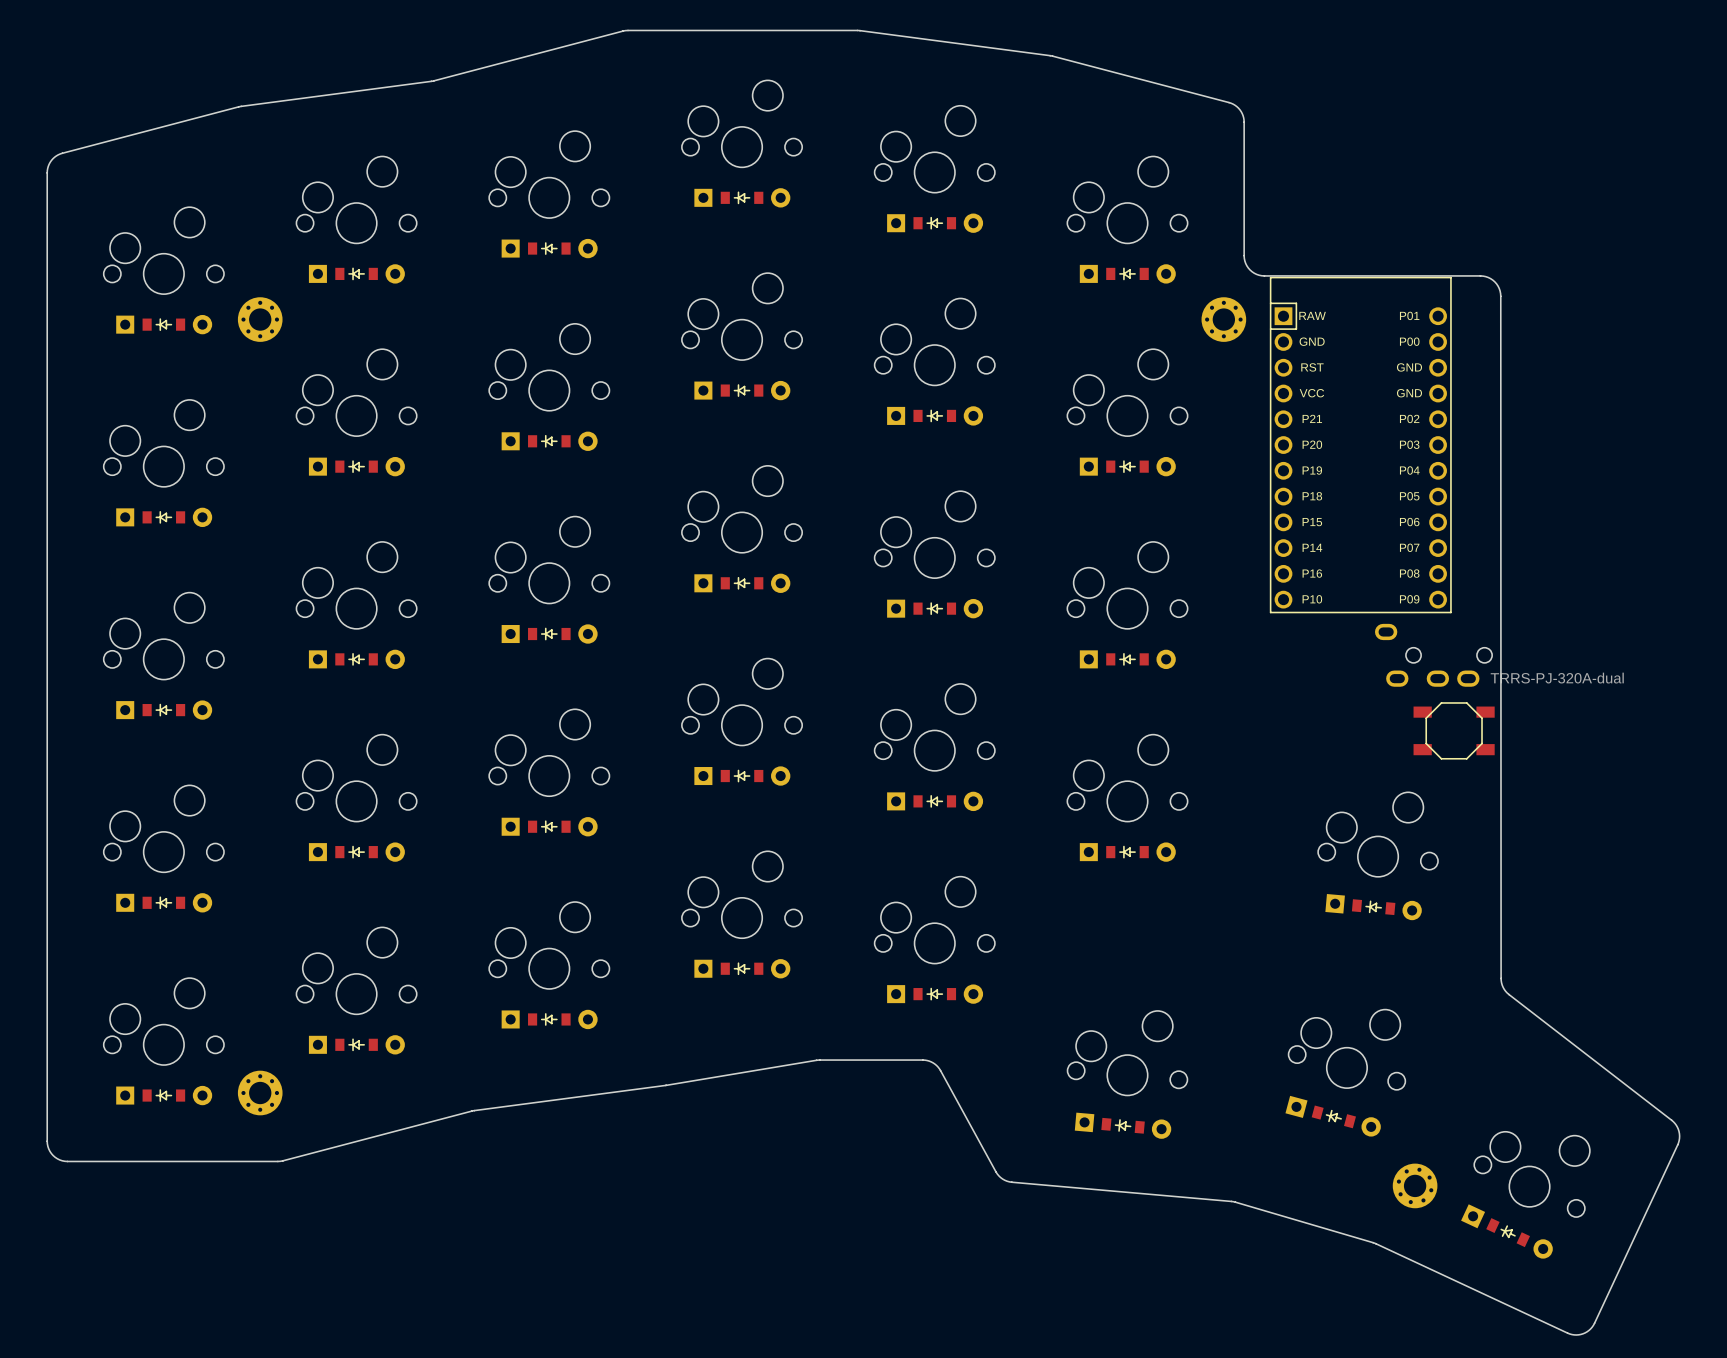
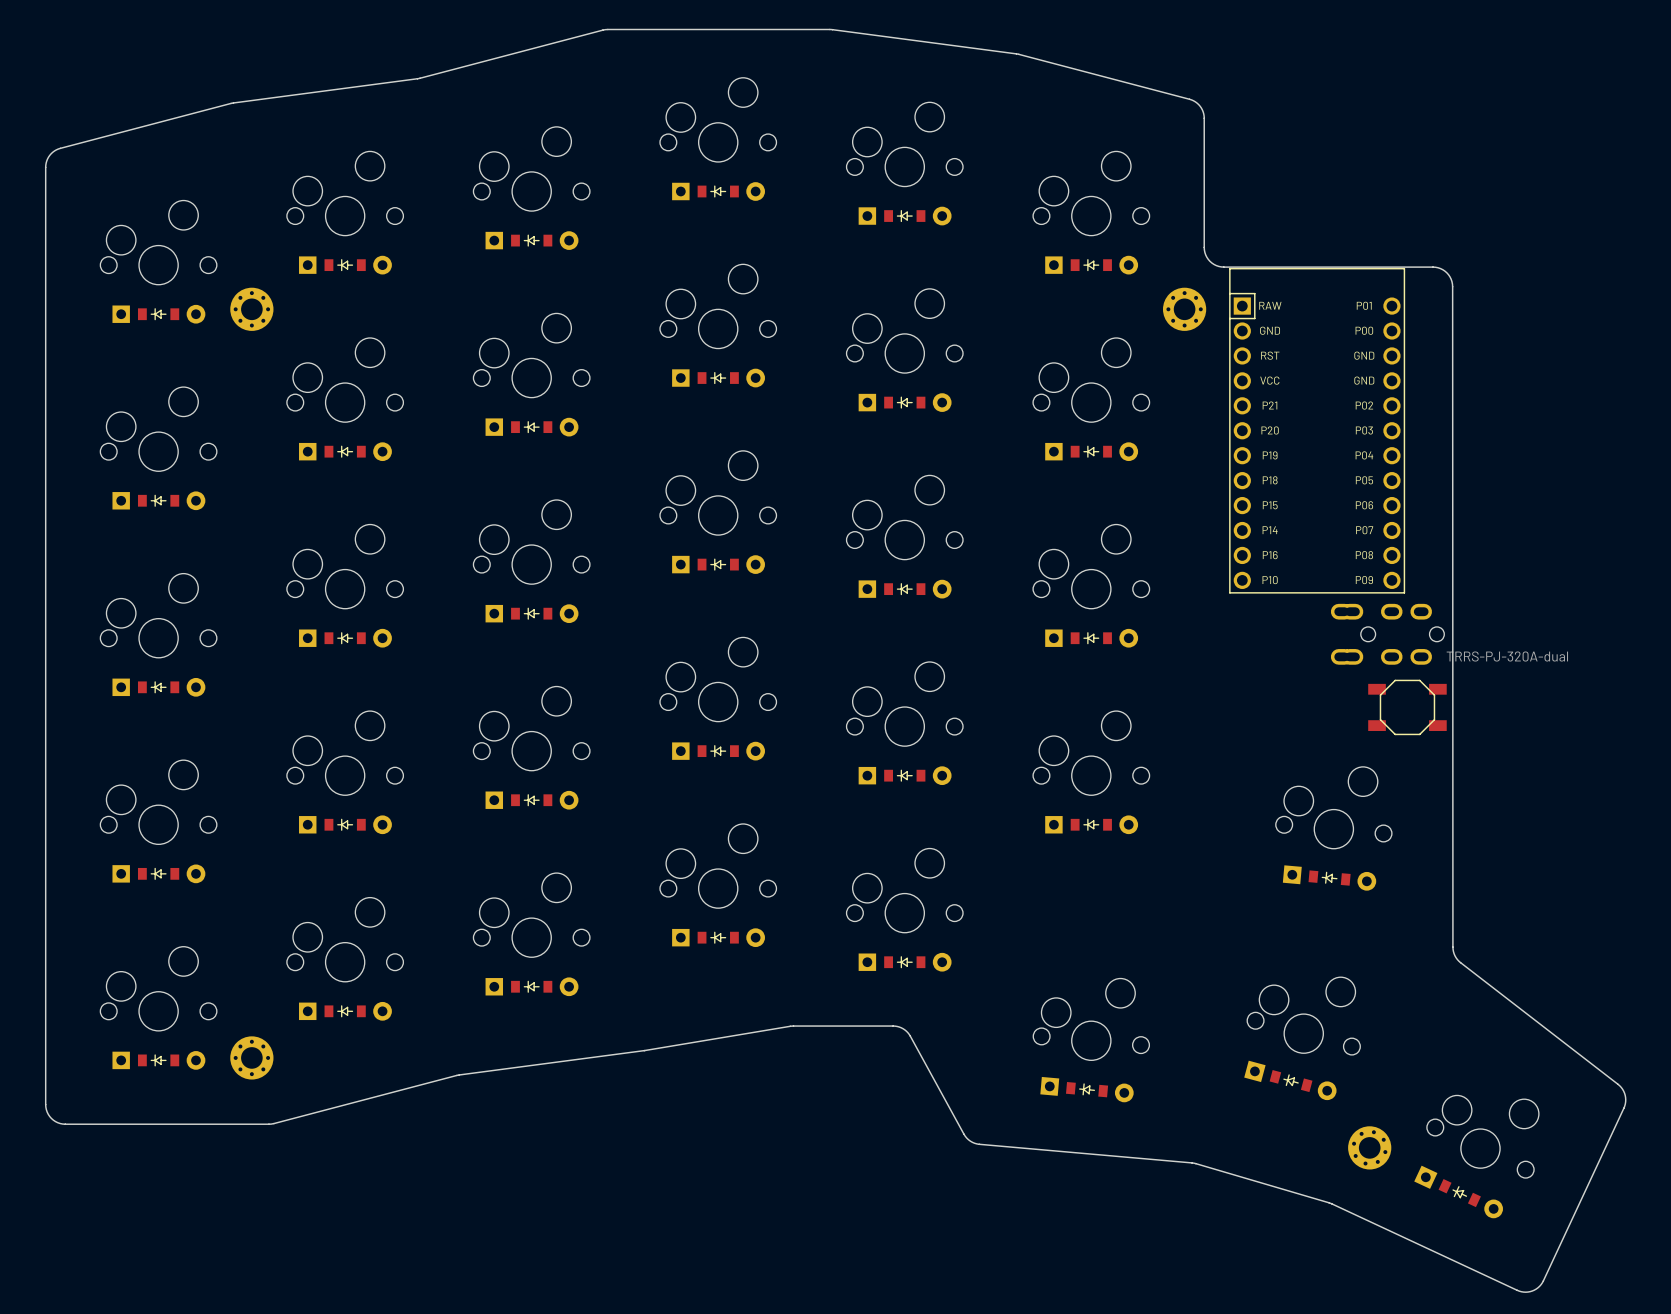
part footprint: [1374, 623, 1493, 687] -> [1330, 603, 1445, 665]

